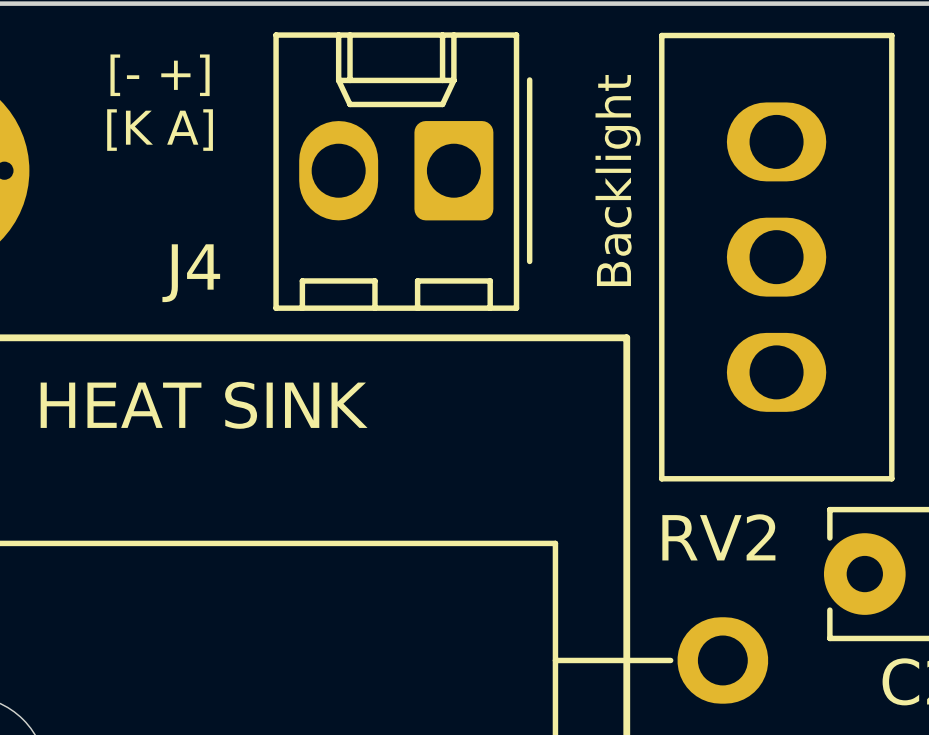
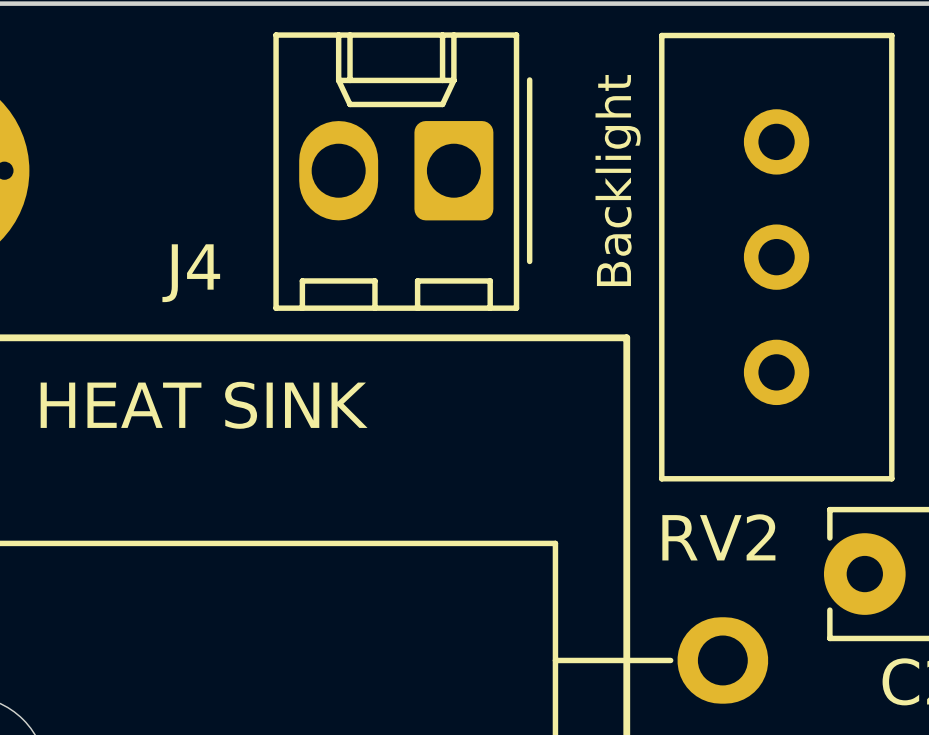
RV2 footprint: [659, 32, 895, 482] -> [659, 32, 895, 482]
text: [- +] (160, 75) -> none
text: [K A] (160, 130) -> none

